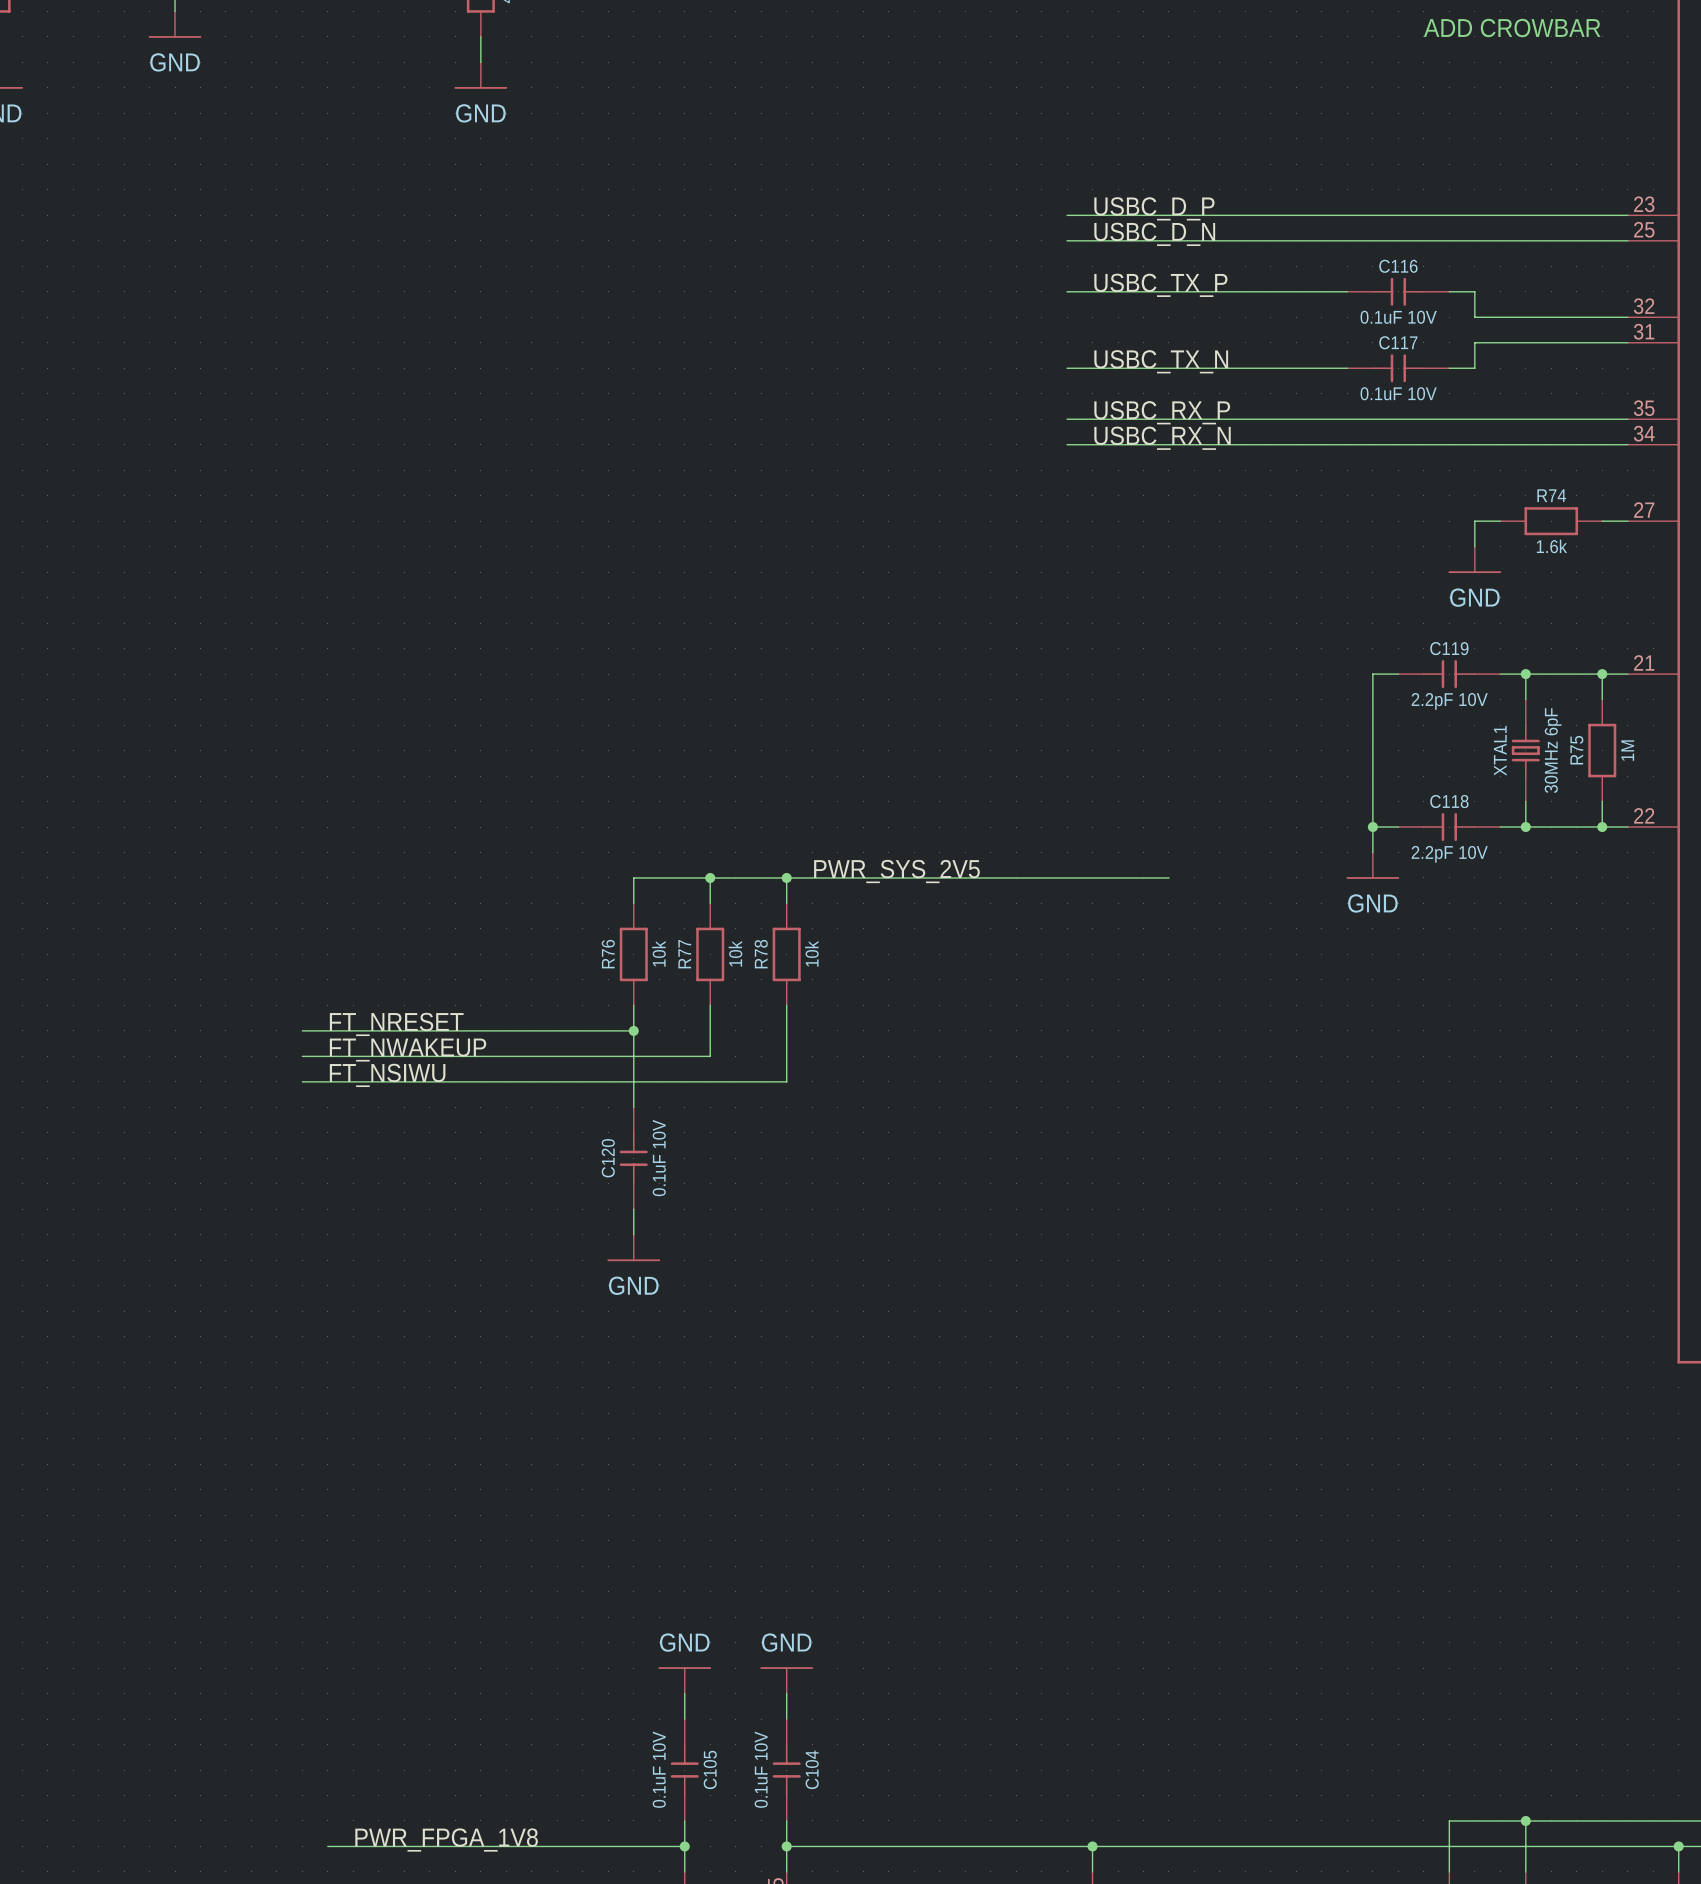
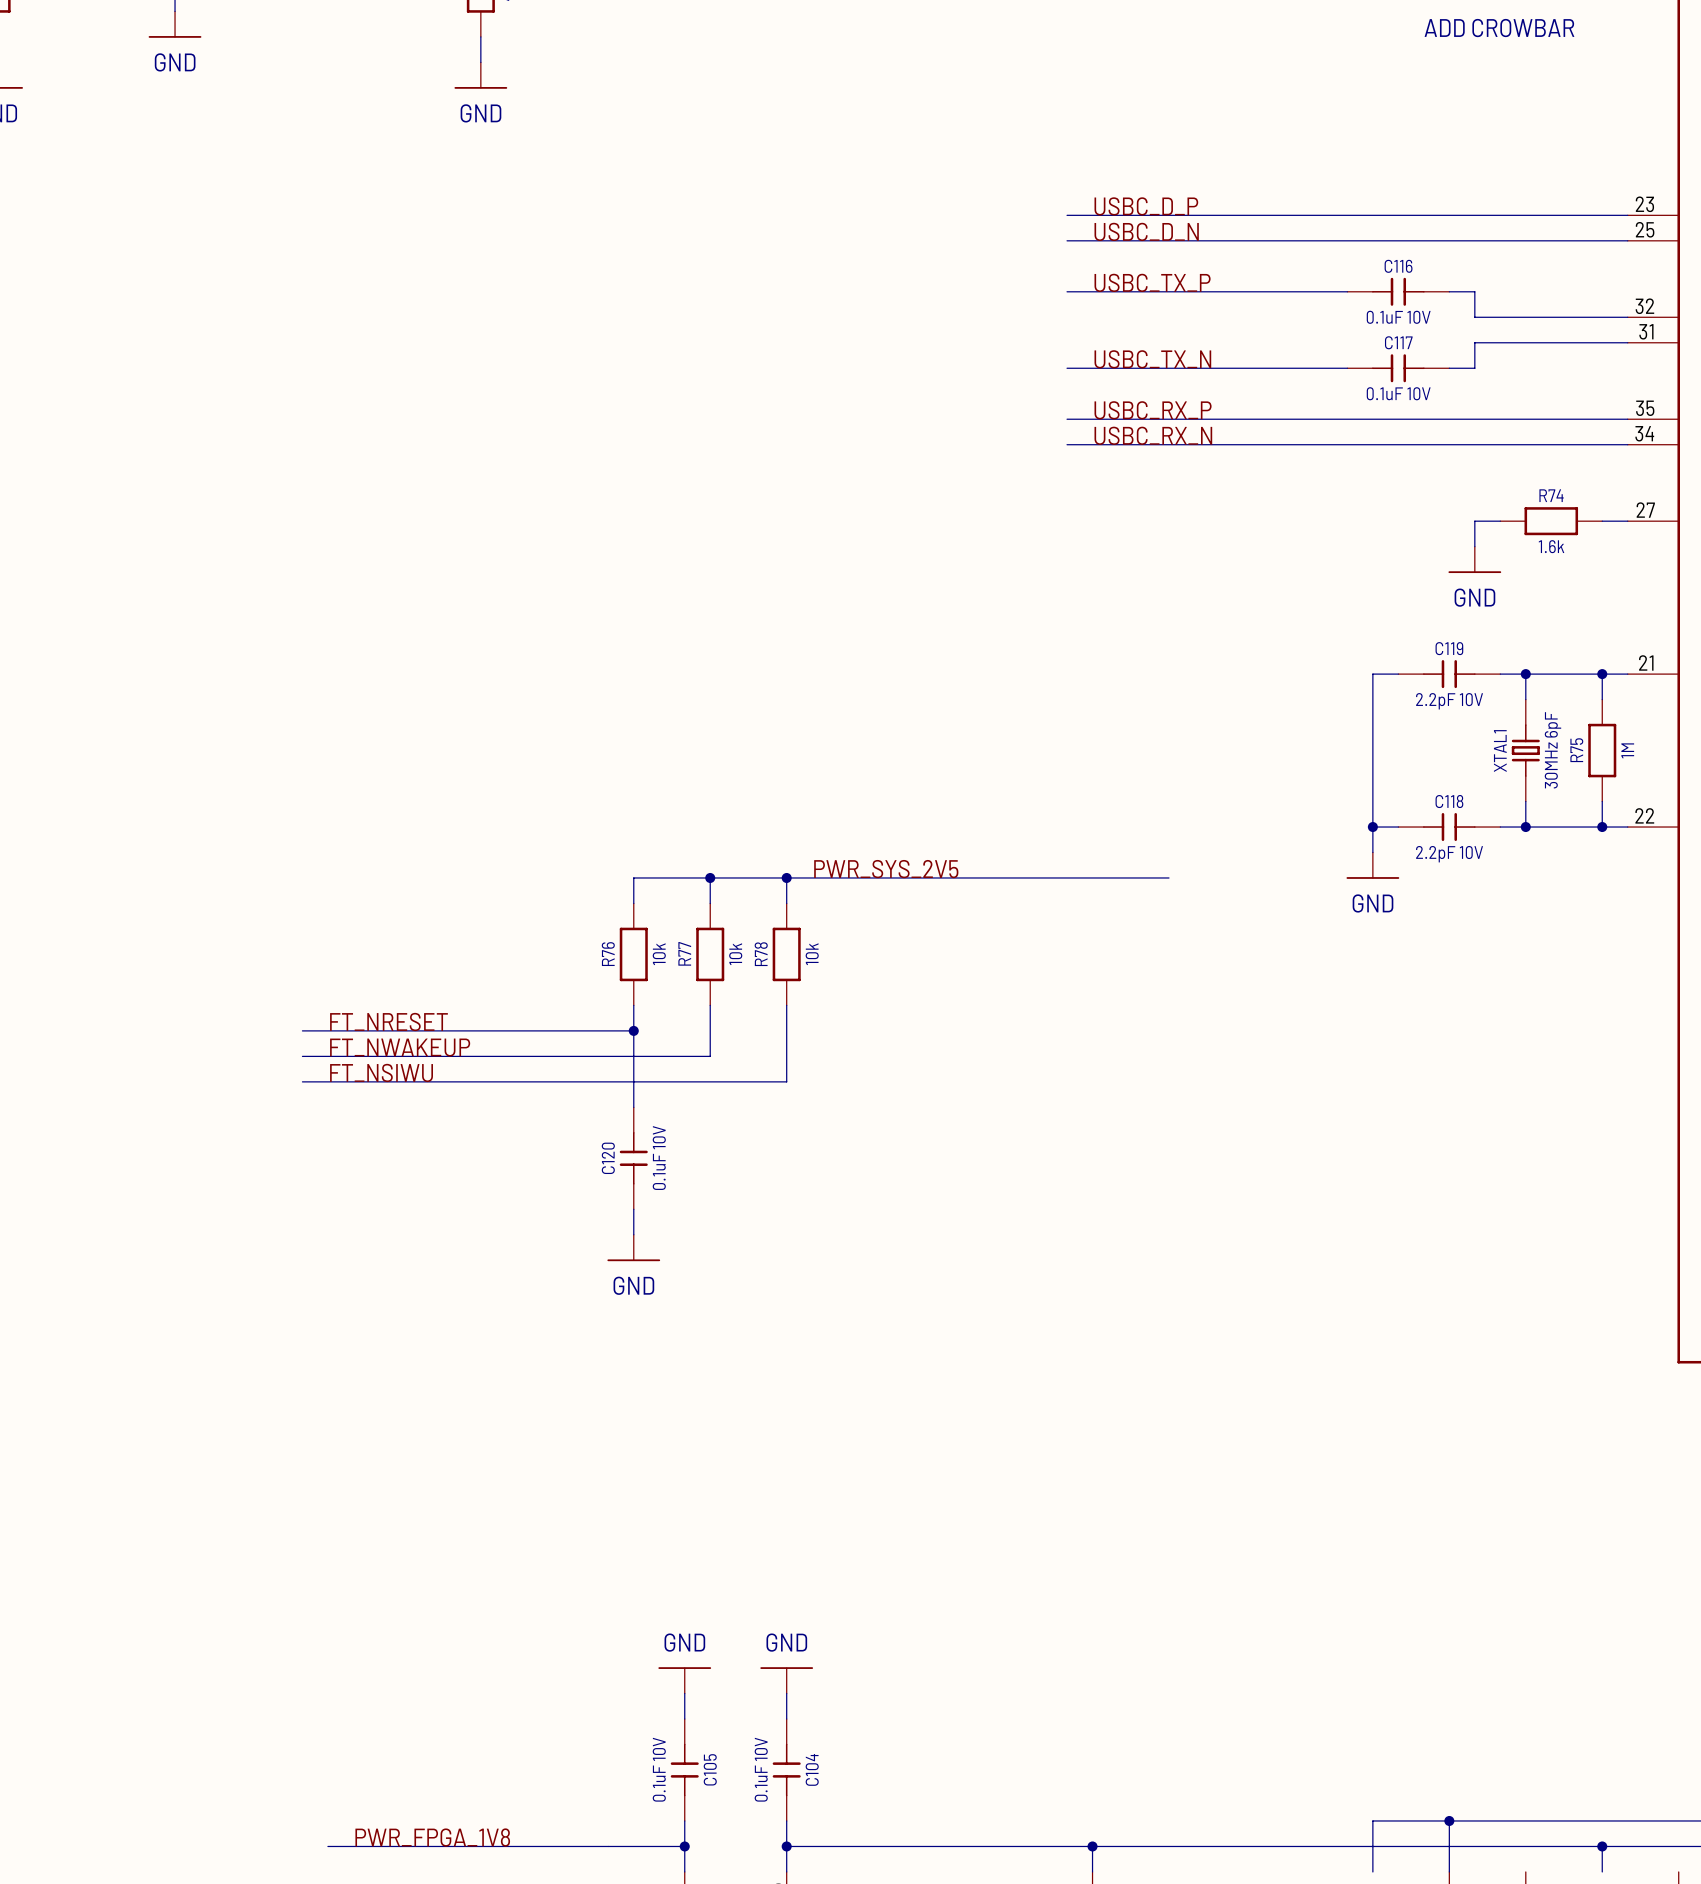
wire: none -> (1449, 1820) (1372, 1820) (1372, 1871)
junction: none -> (1449, 1820)
wire: (1525, 1820) (1525, 1871) -> none
junction: (1525, 1820) -> none
junction: none -> (1602, 1846)
wire: (1678, 1846) (1678, 1871) -> (1602, 1846) (1602, 1871)
junction: (1678, 1846) -> none

